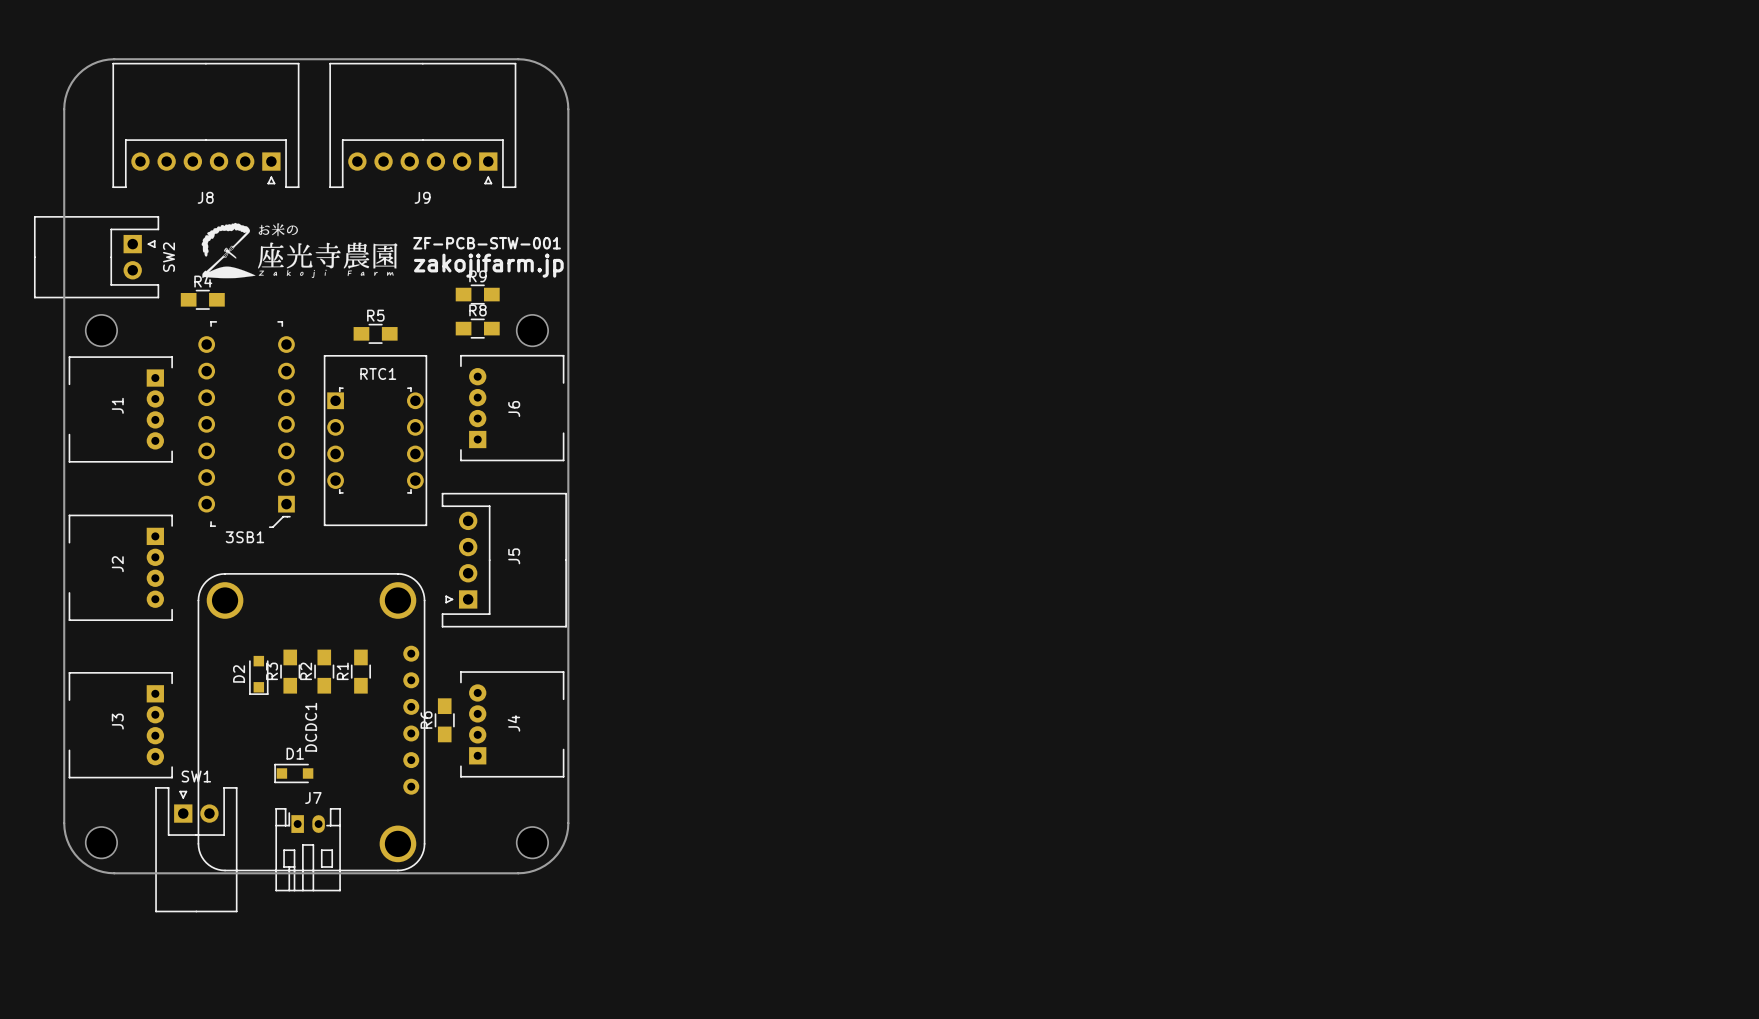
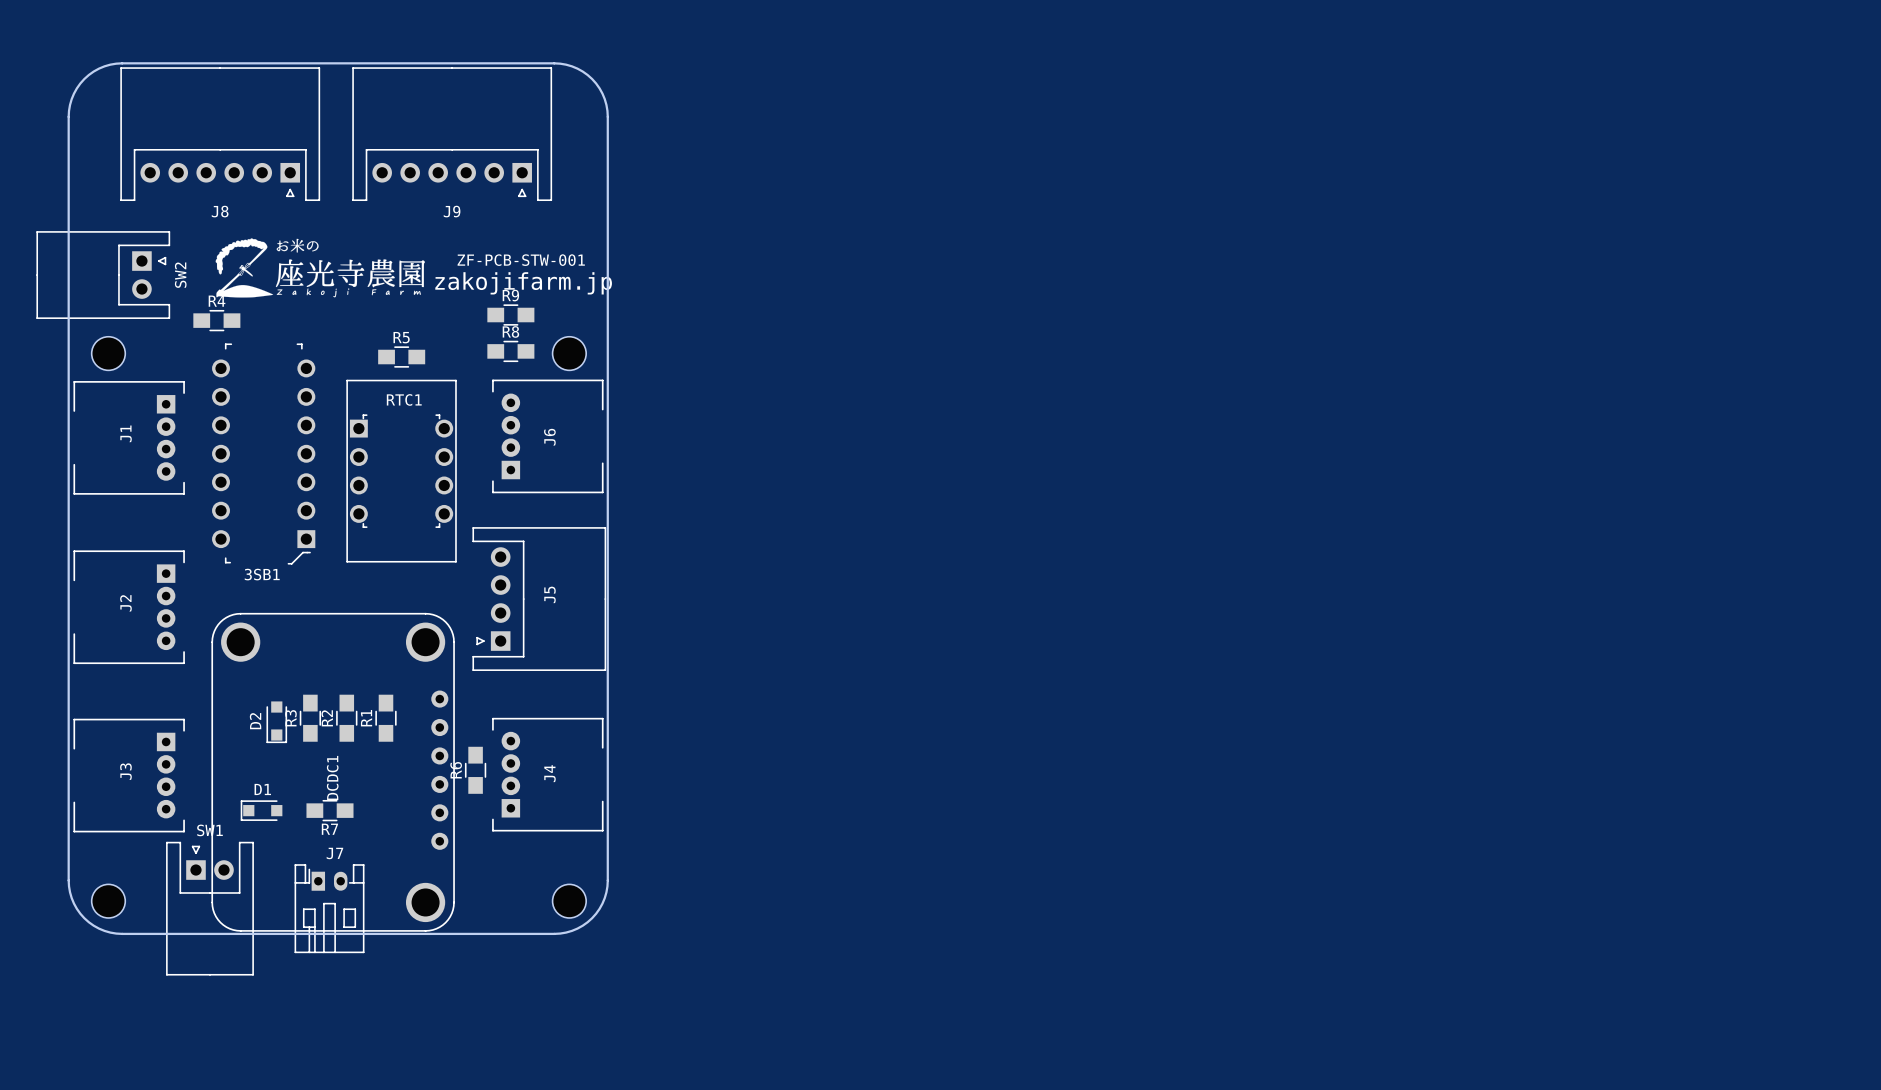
R7: none -> (329, 810)
D1 position: (293, 773) -> (261, 810)

